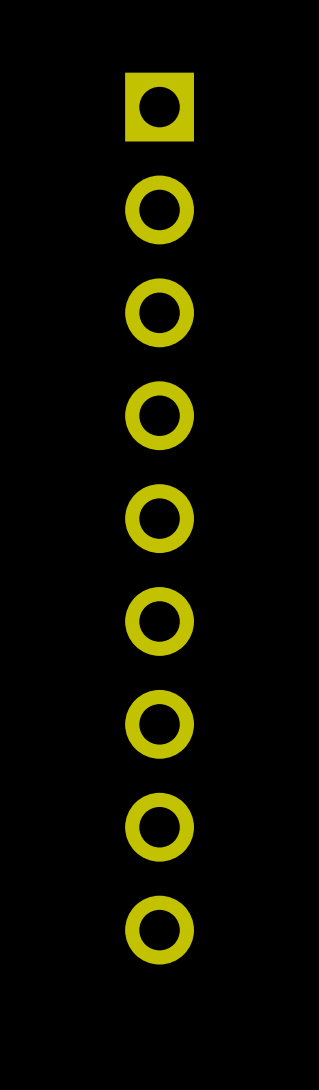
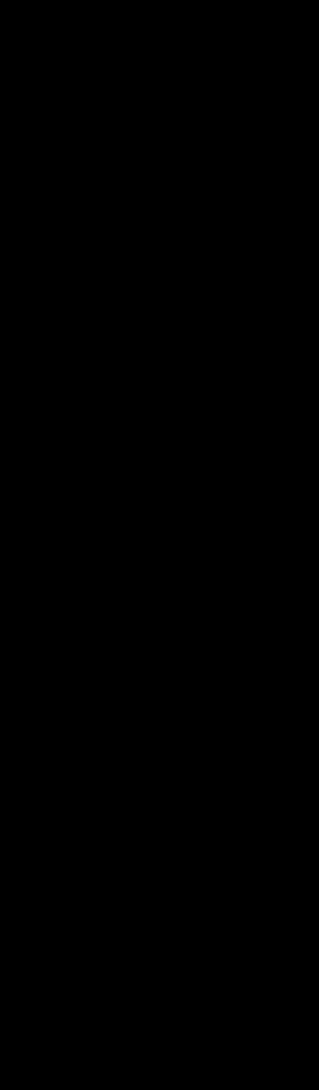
part: (159, 518) -> none

